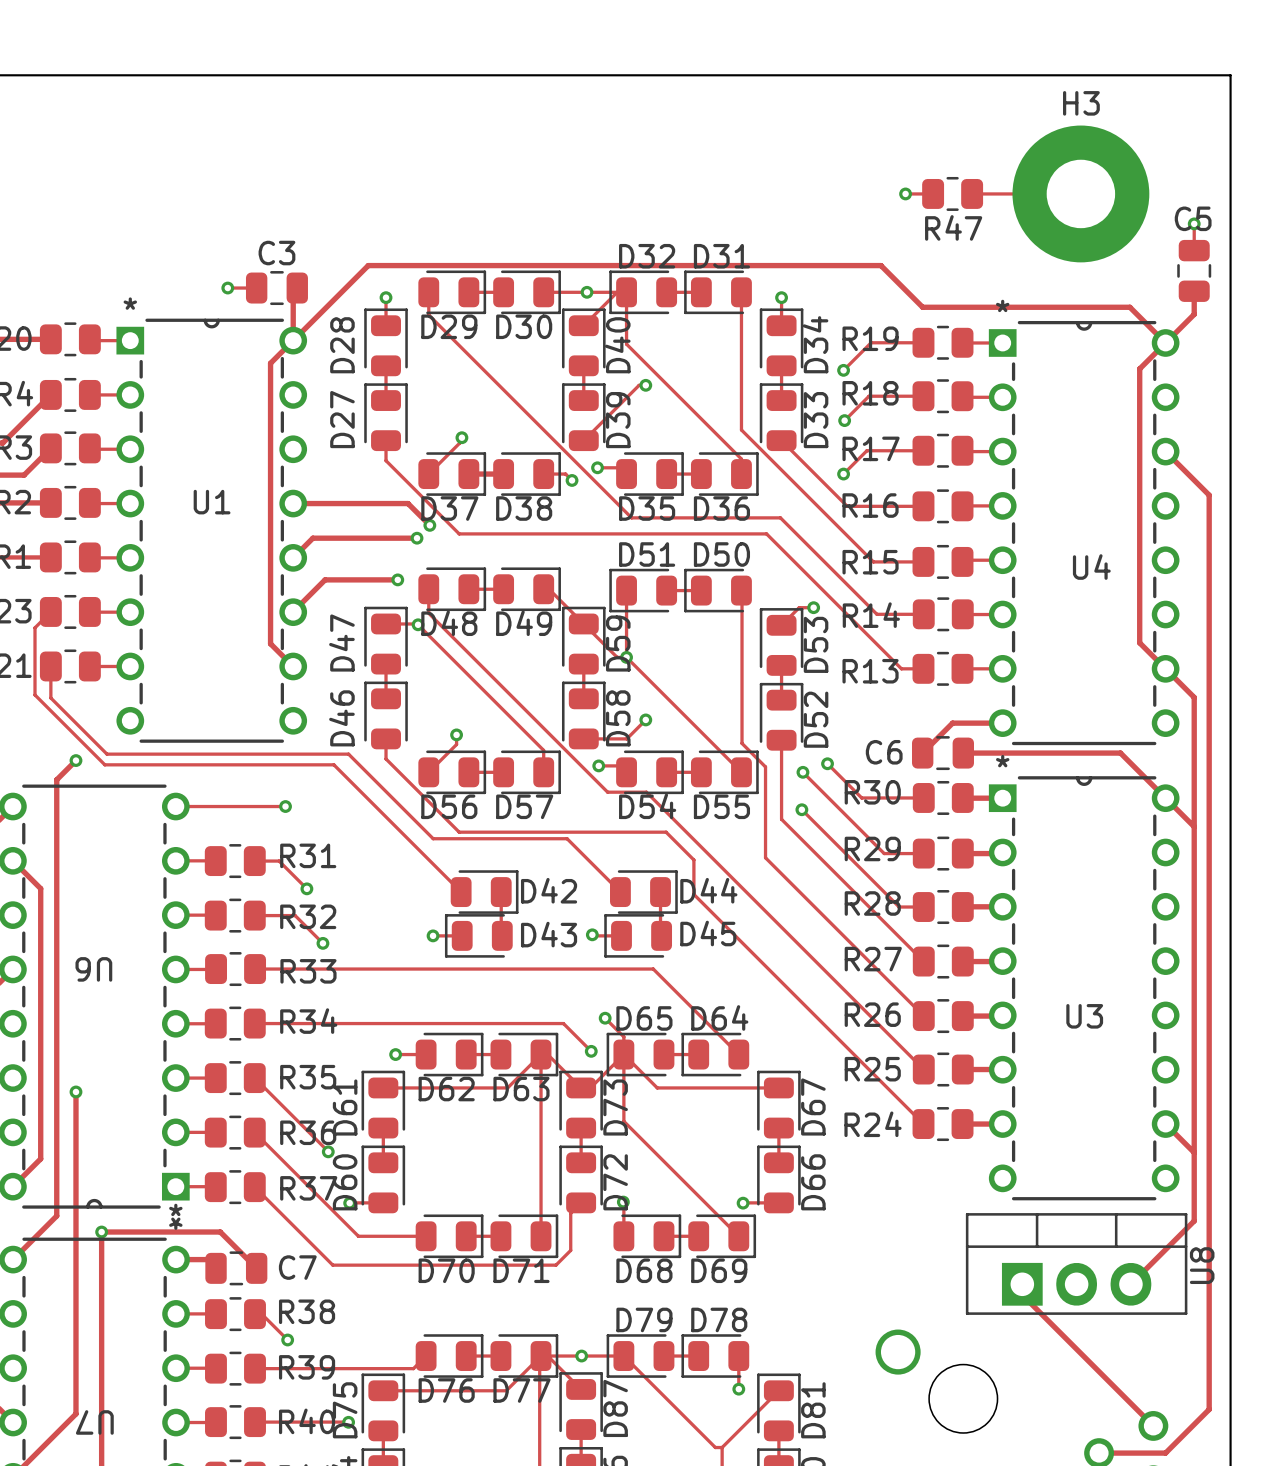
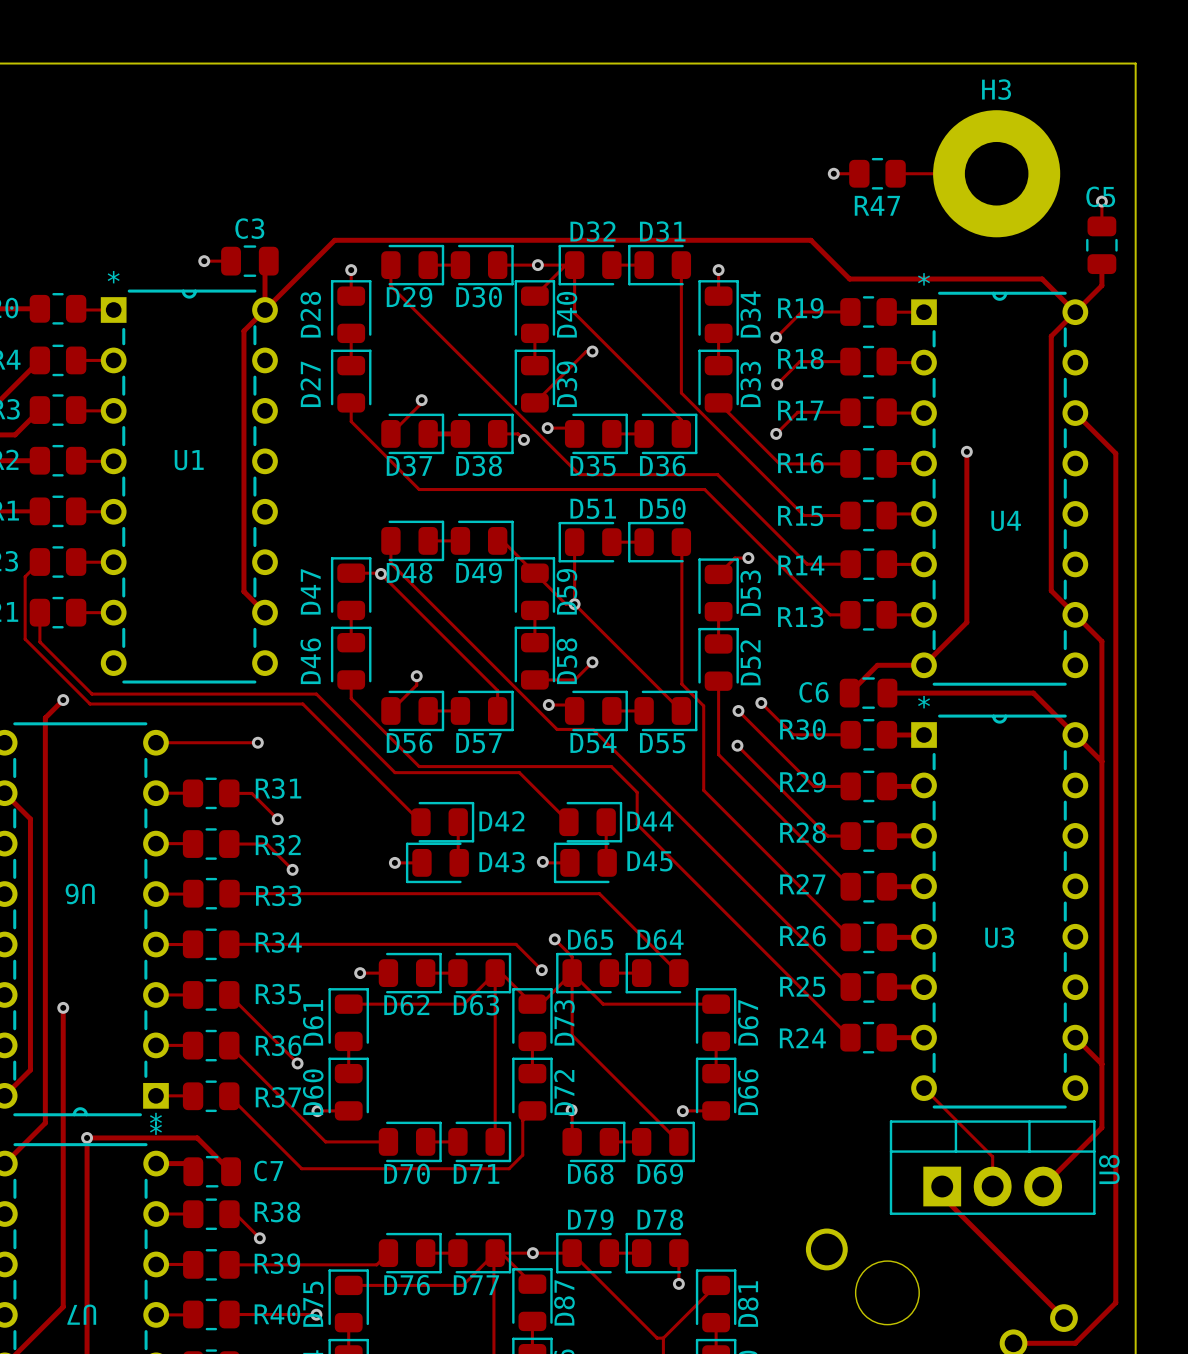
track: none -> (966, 451) (966, 622) (924, 665)
via: none -> (966, 451)
track: (293, 503) (408, 503) (429, 525) -> none
via: (429, 525) -> none
track: (417, 538) (312, 538) (293, 557) -> none
via: (417, 538) -> none
track: (397, 579) (325, 579) (293, 611) -> none
via: (397, 579) -> none
track: none -> (924, 1088) (992, 1156) (992, 1186)

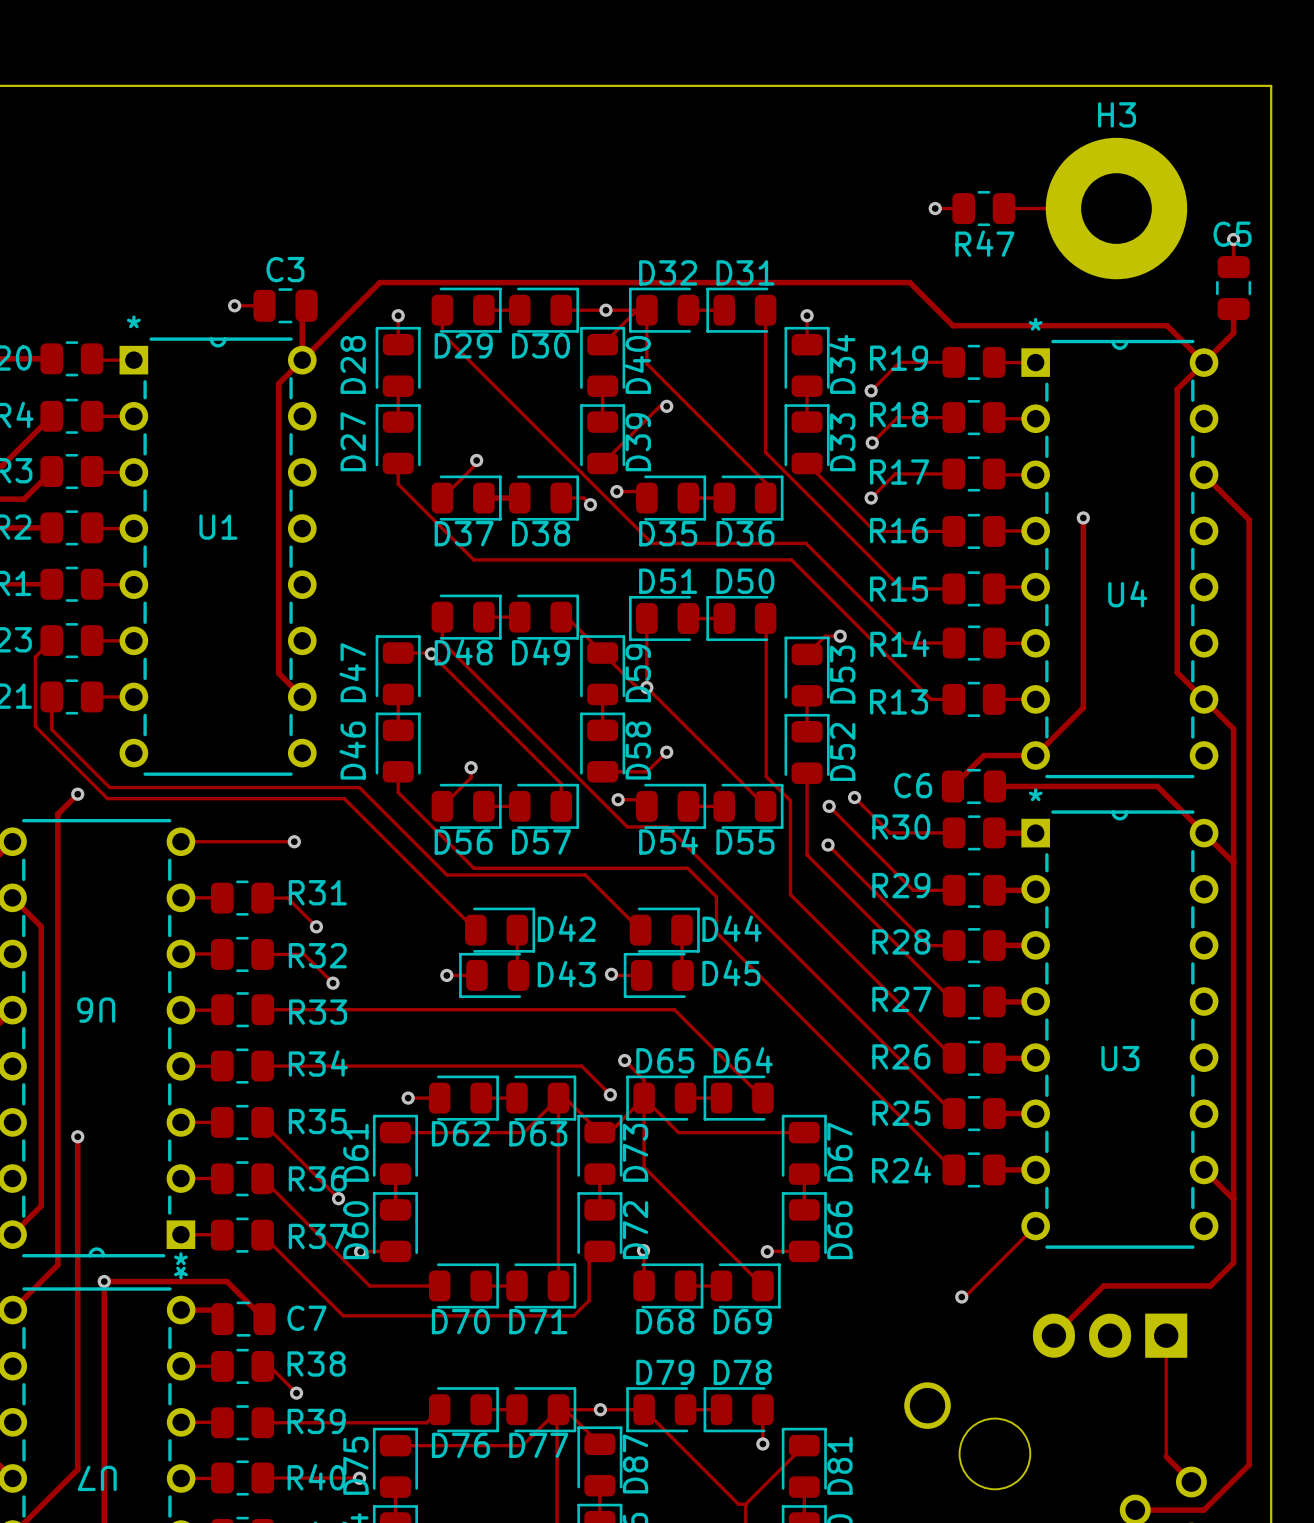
track: (924, 1088) (992, 1156) (992, 1186) -> (1035, 1226) (964, 1297) (961, 1297)
track: (1101, 1121) (1101, 1127) (1043, 1186) -> (1233, 1262) (1210, 1285) (1103, 1285) (1053, 1335)
via: none -> (961, 1297)
U8 side: top (992, 1167) -> bottom (1110, 1335)
track: (942, 1186) (942, 1196) (1041, 1295) -> (1166, 1335) (1166, 1456)

